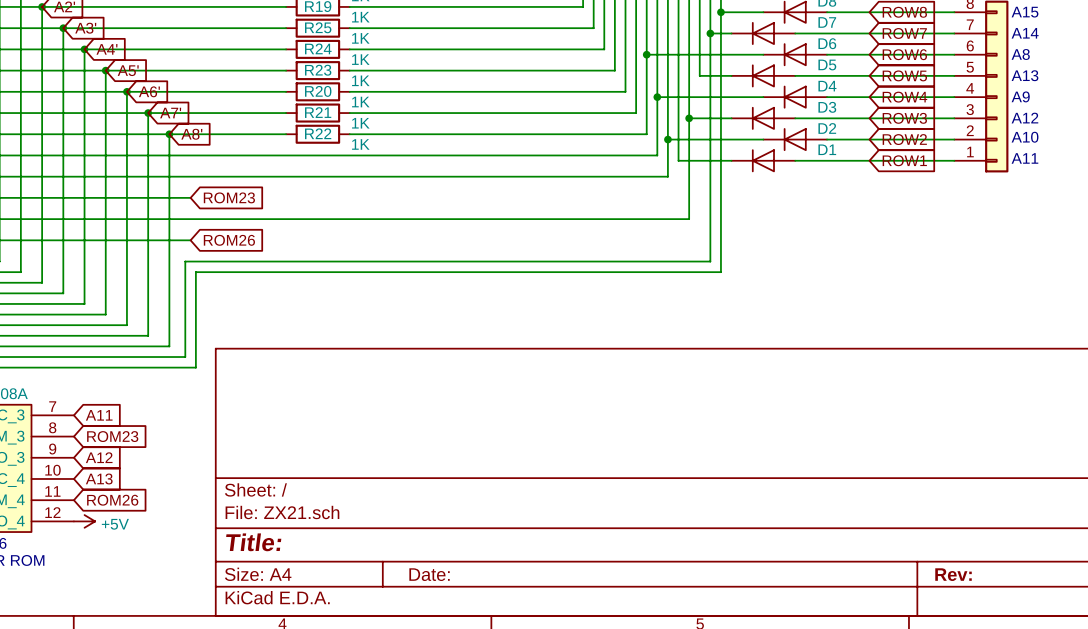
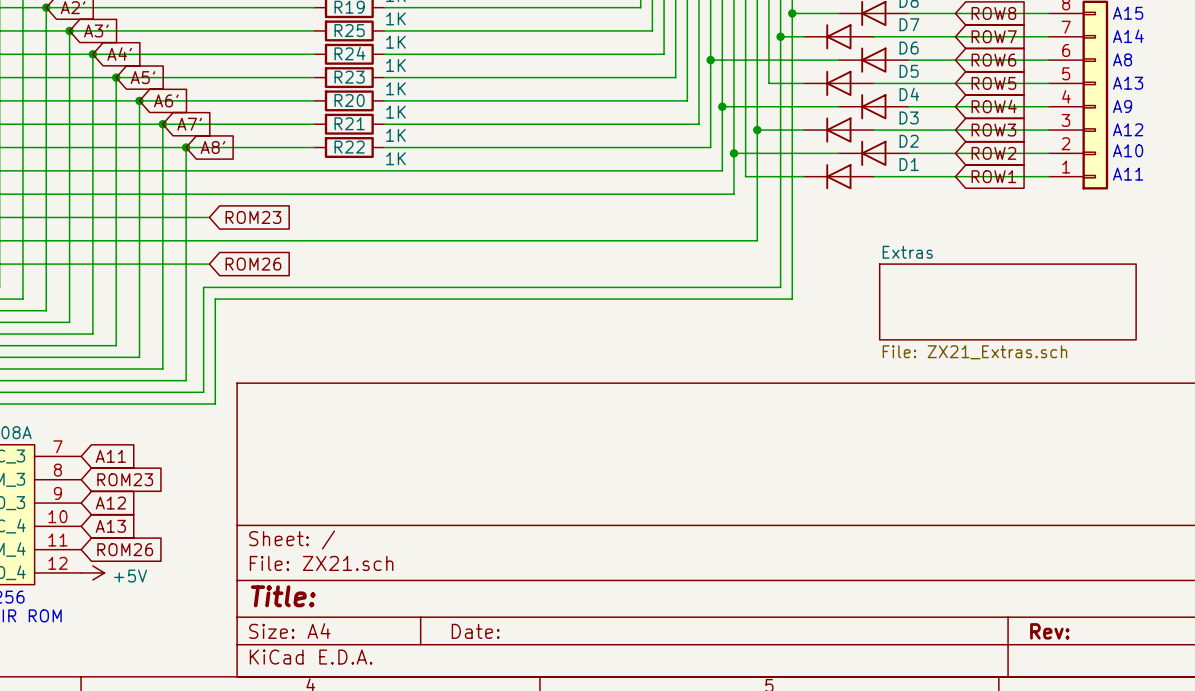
sheet Extras: none -> File: ZX21_Extras.sch (1007, 301)

